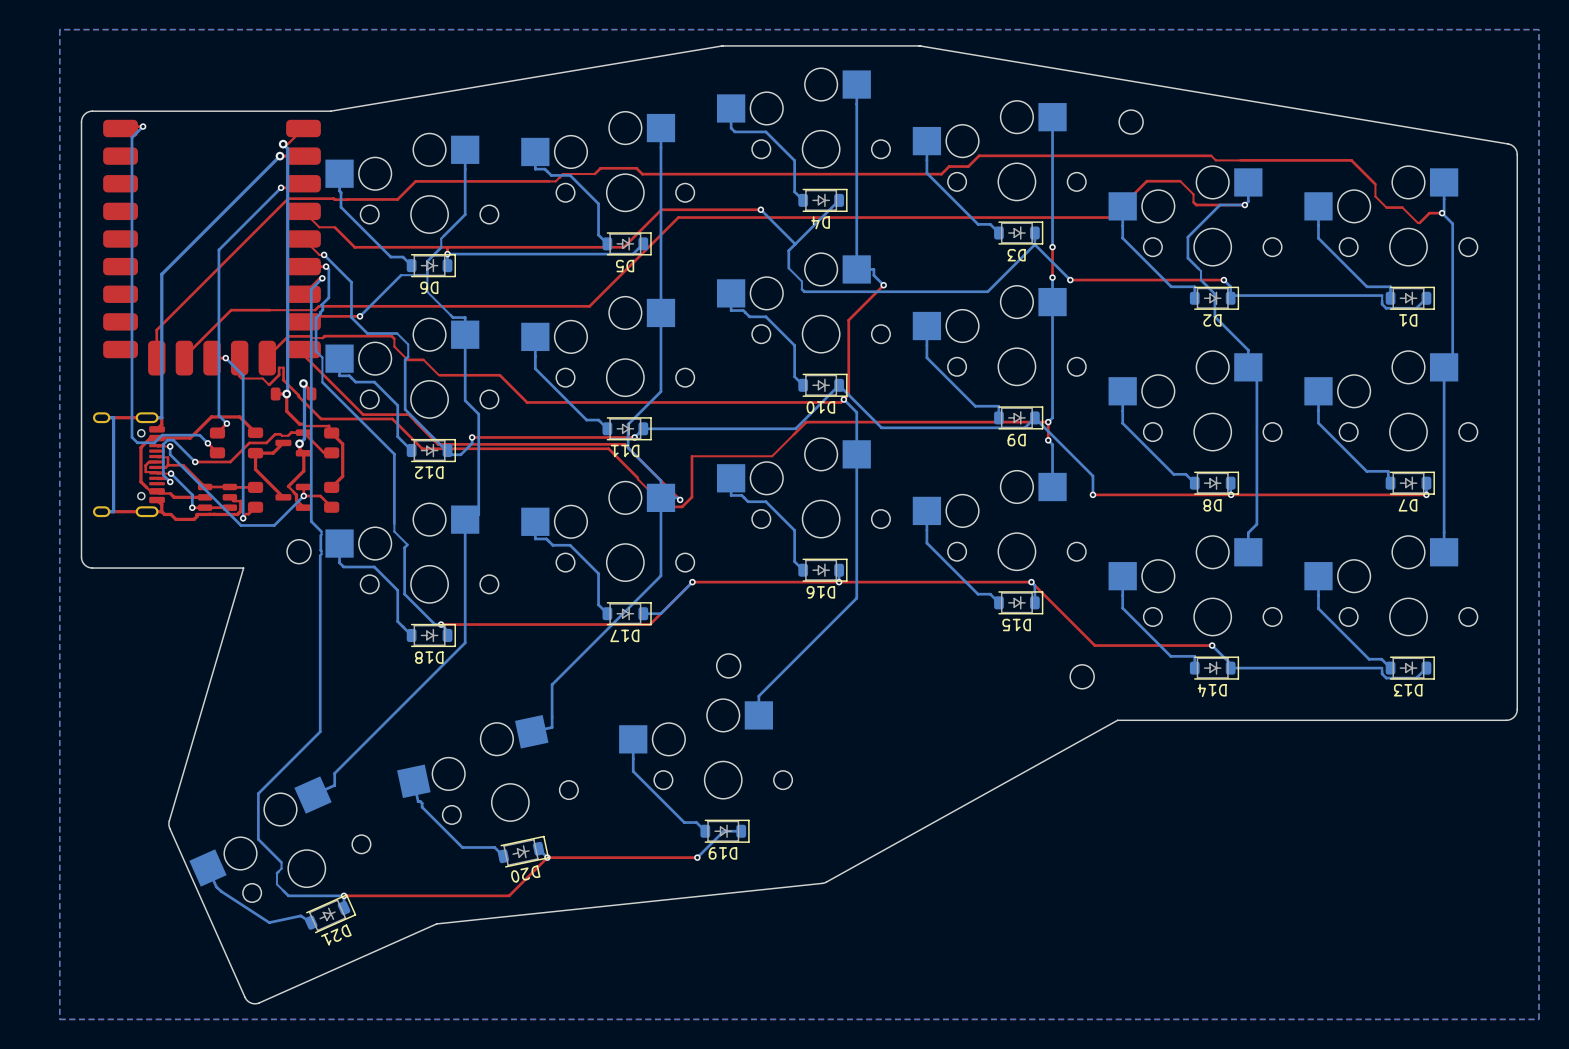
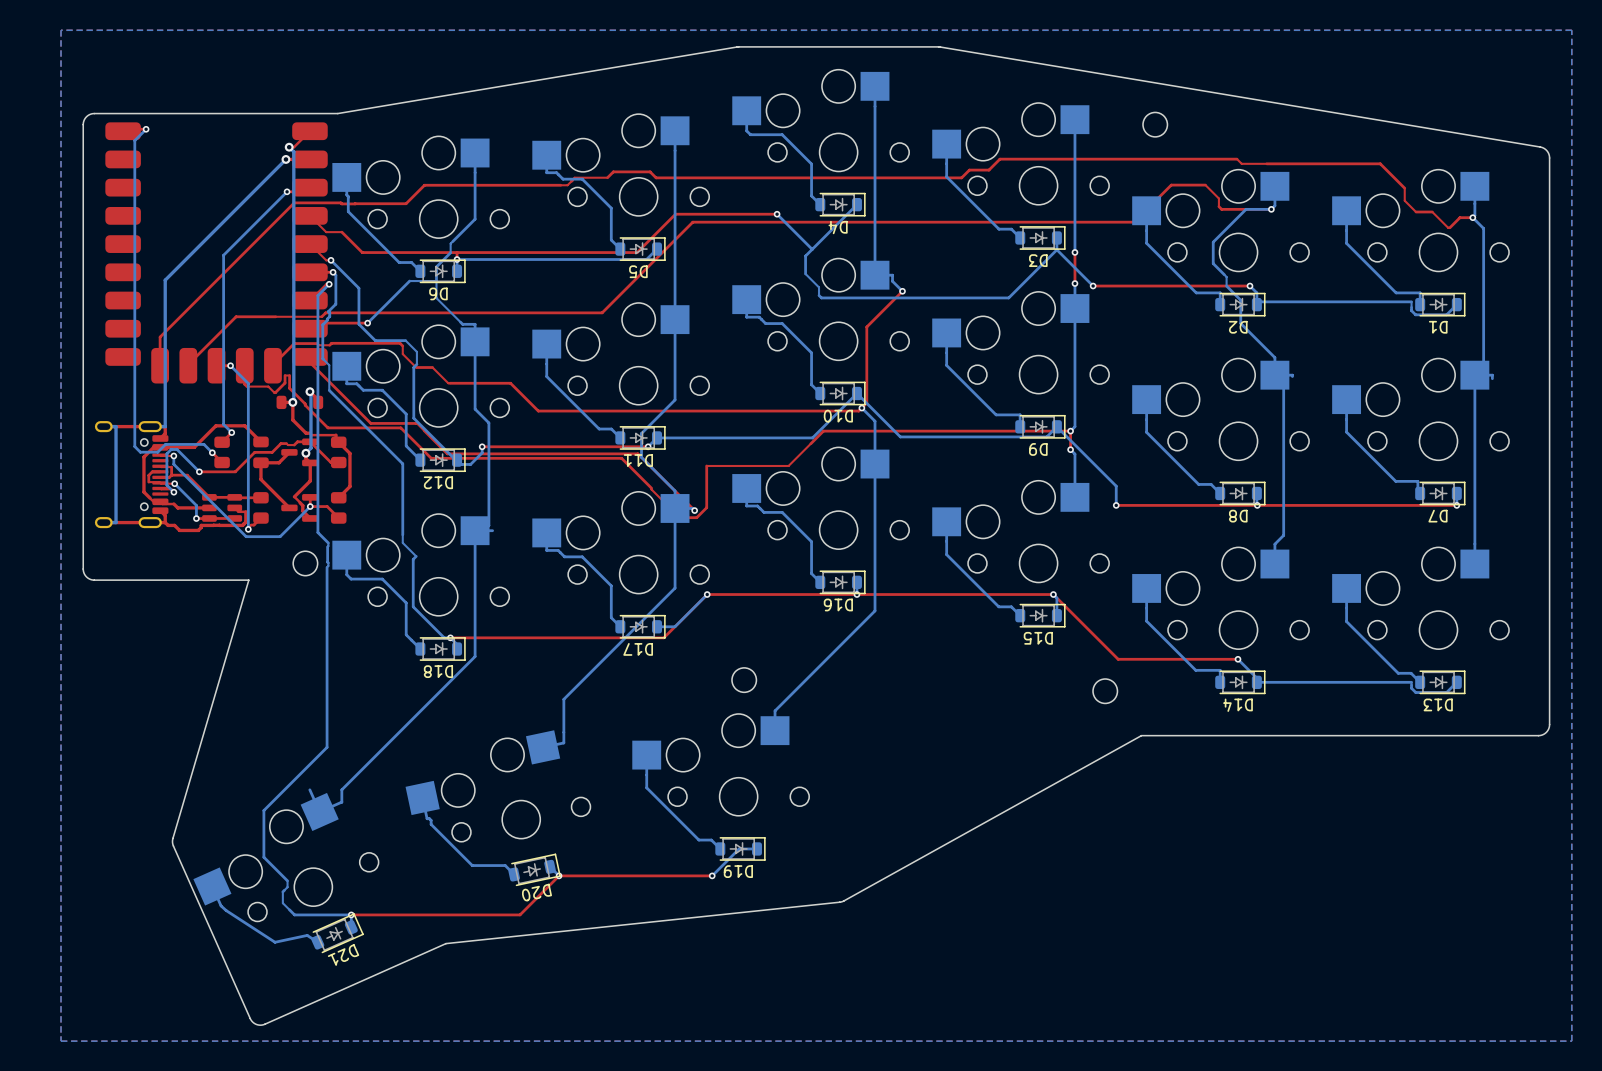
bottom track: none -> (1283, 375) (1292, 376)
bottom track: none -> (1483, 375) (1492, 375) (1492, 378)
bottom track: none -> (492, 530) (483, 530)
bottom track: none -> (309, 789) (319, 811)

